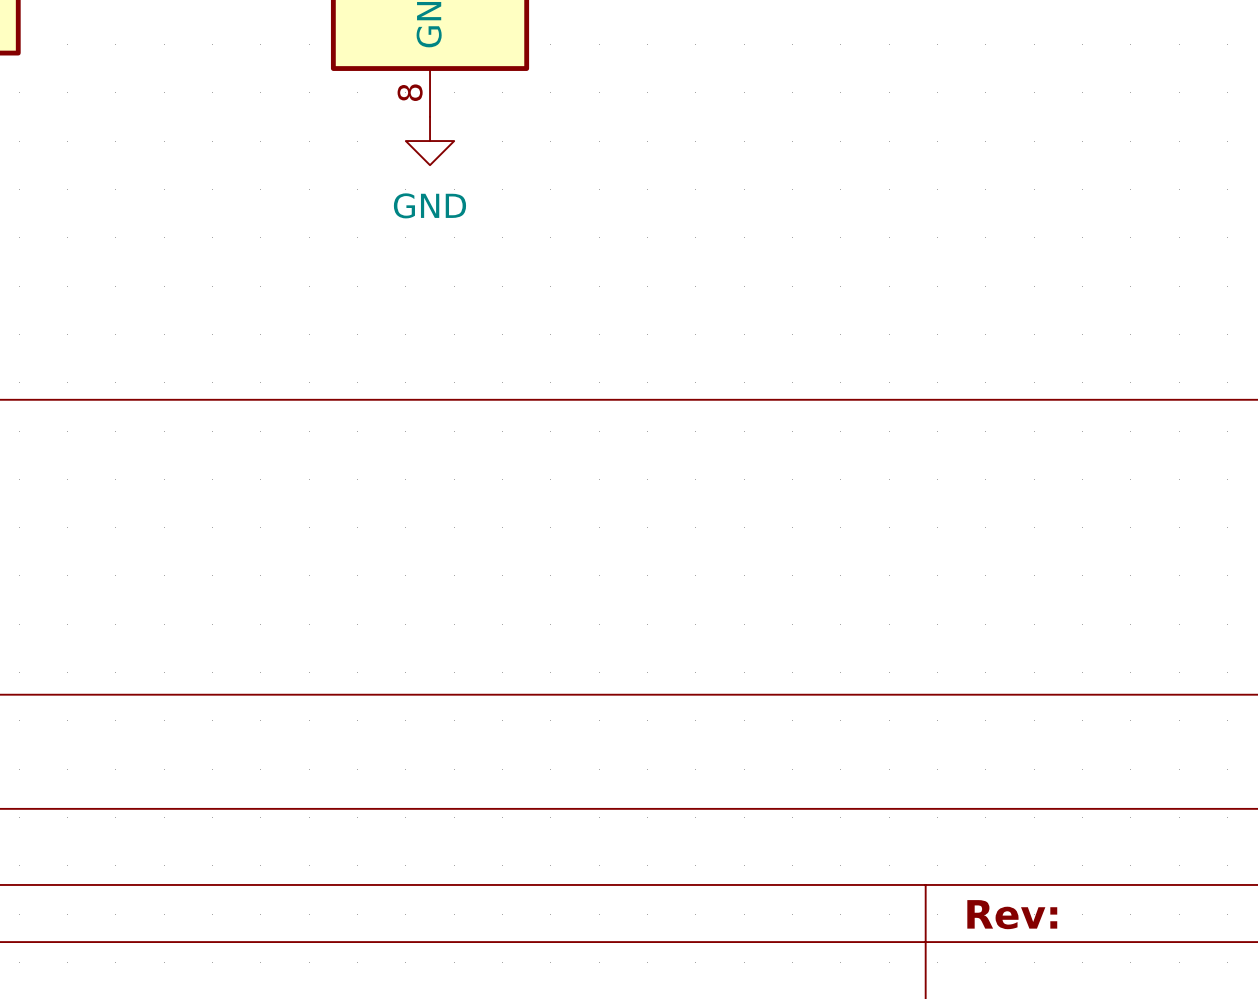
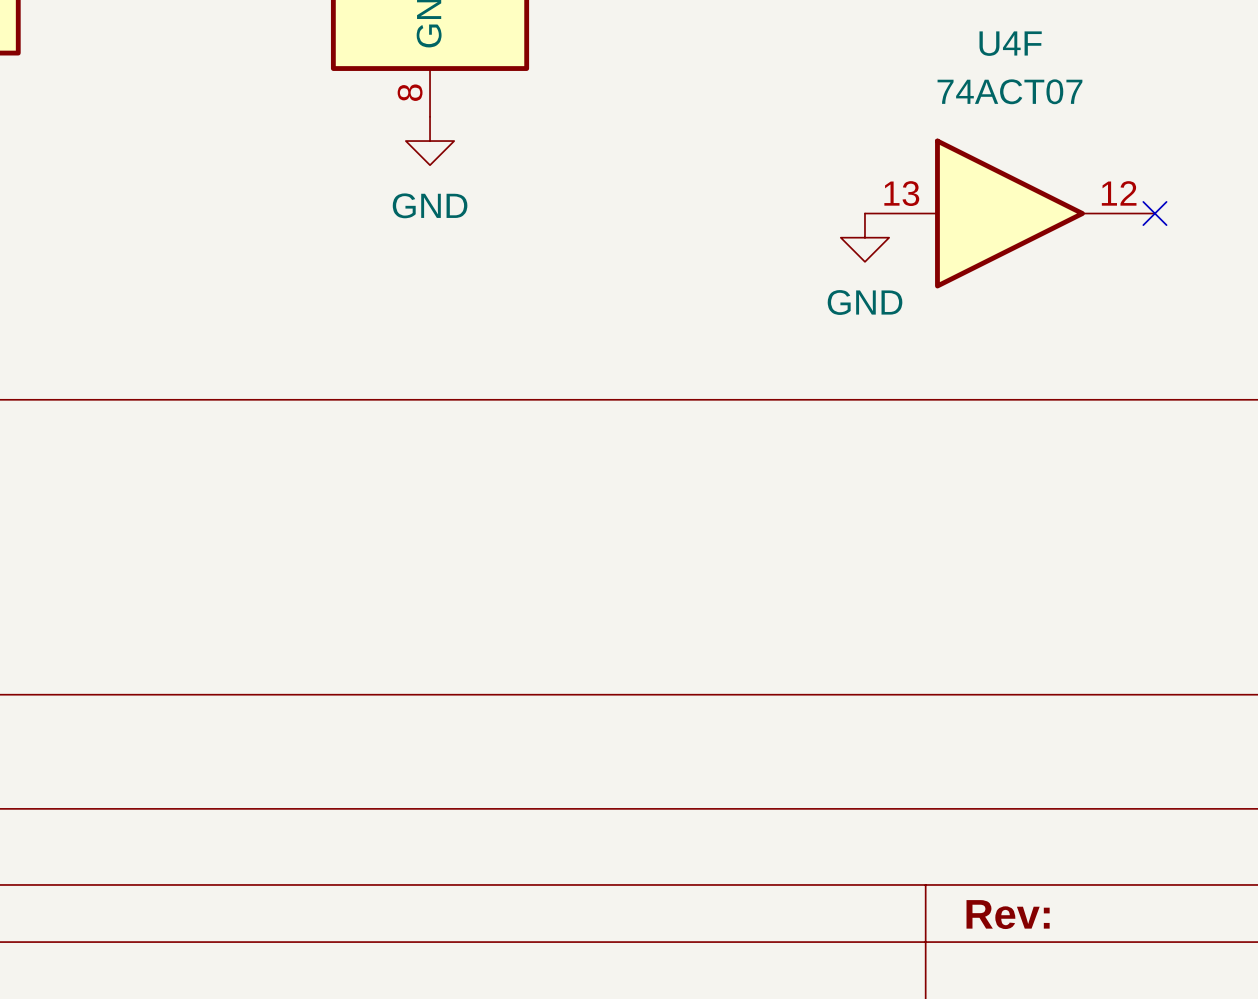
U4F: none -> 74ACT07 (1009, 213)
no-connect mark: none -> (1154, 213)
power symbol: none -> GND (864, 237)

